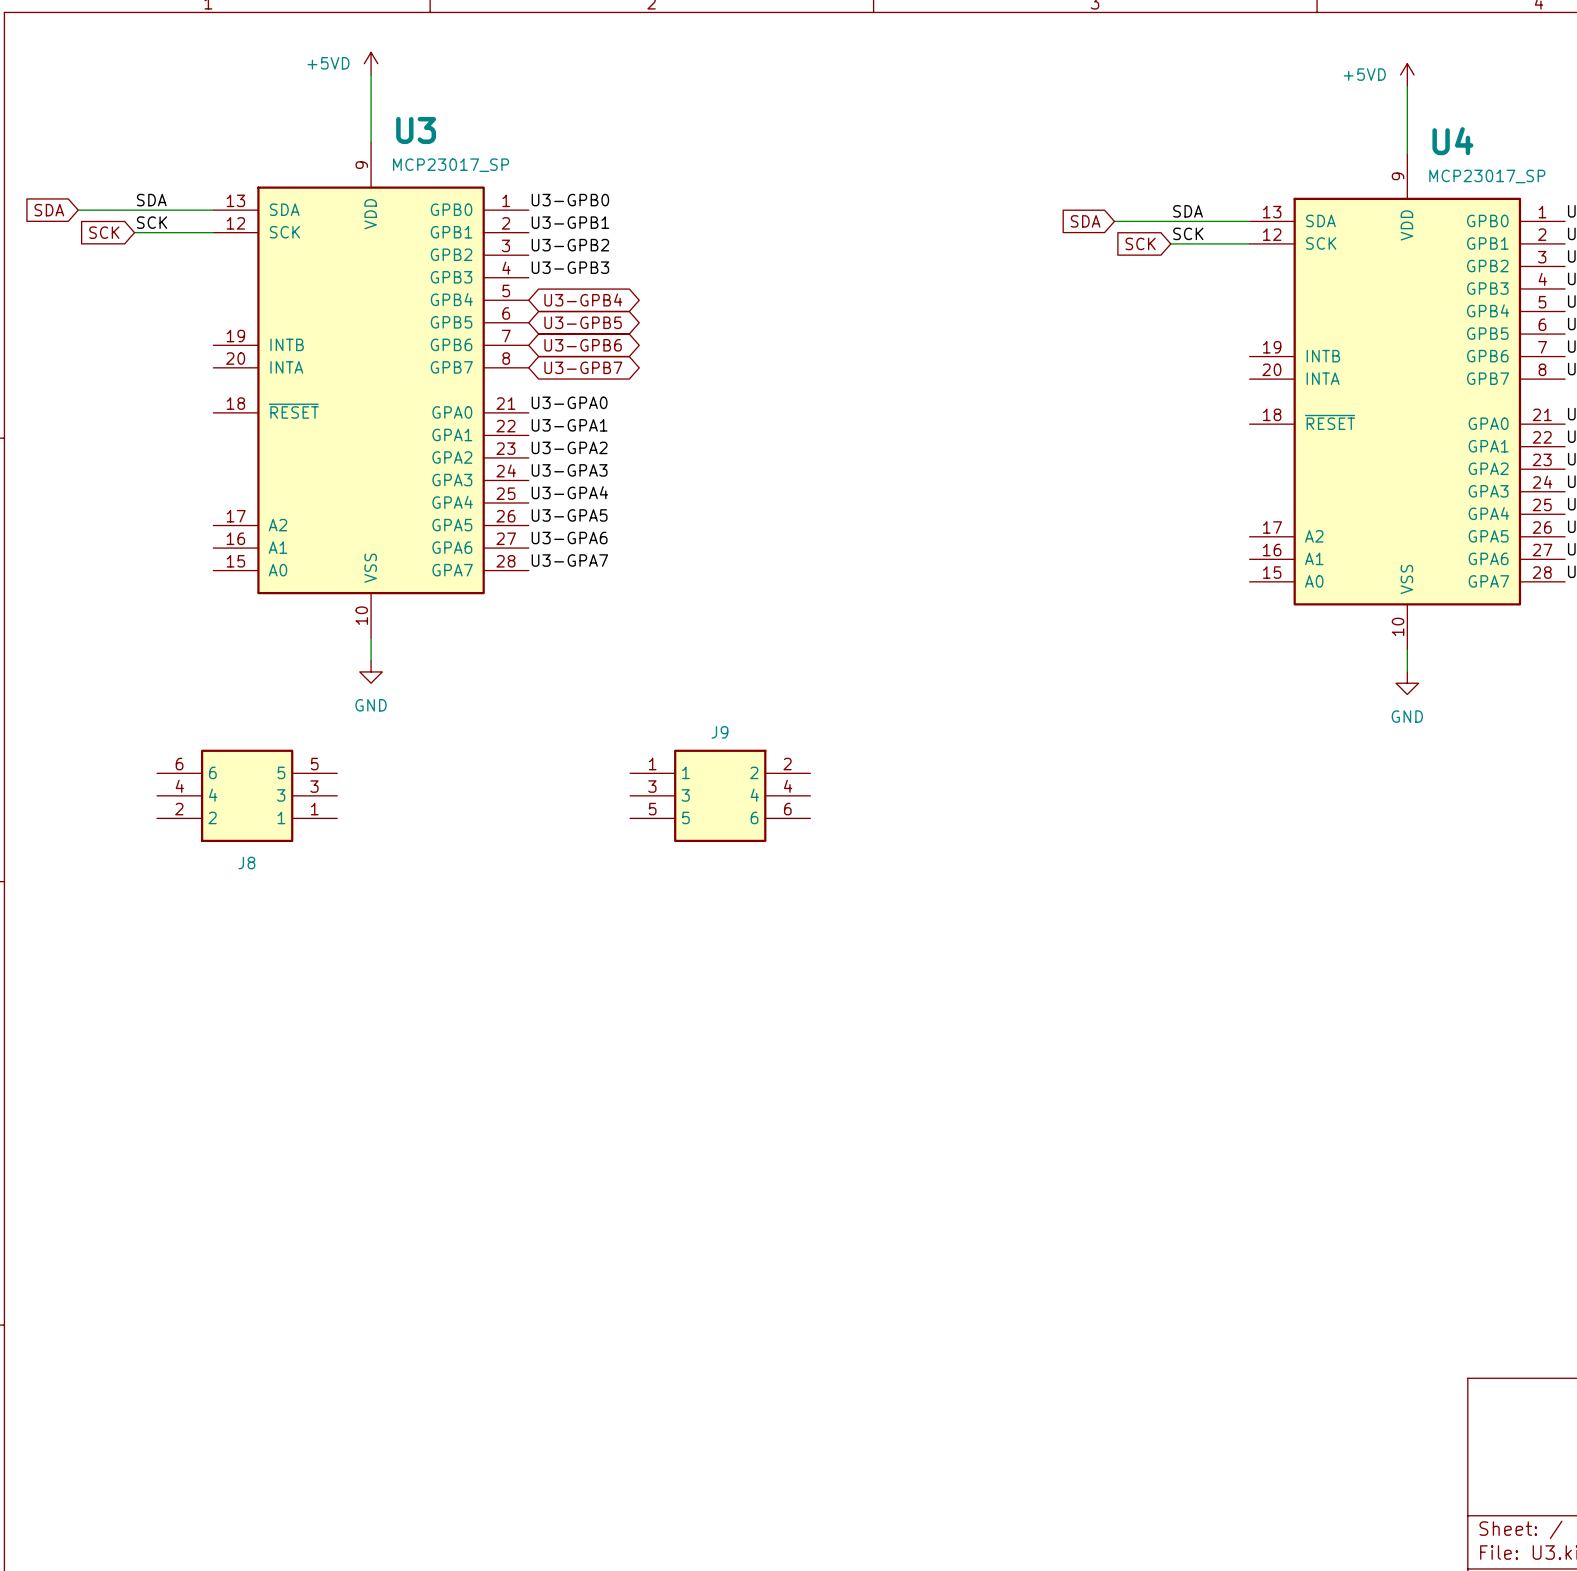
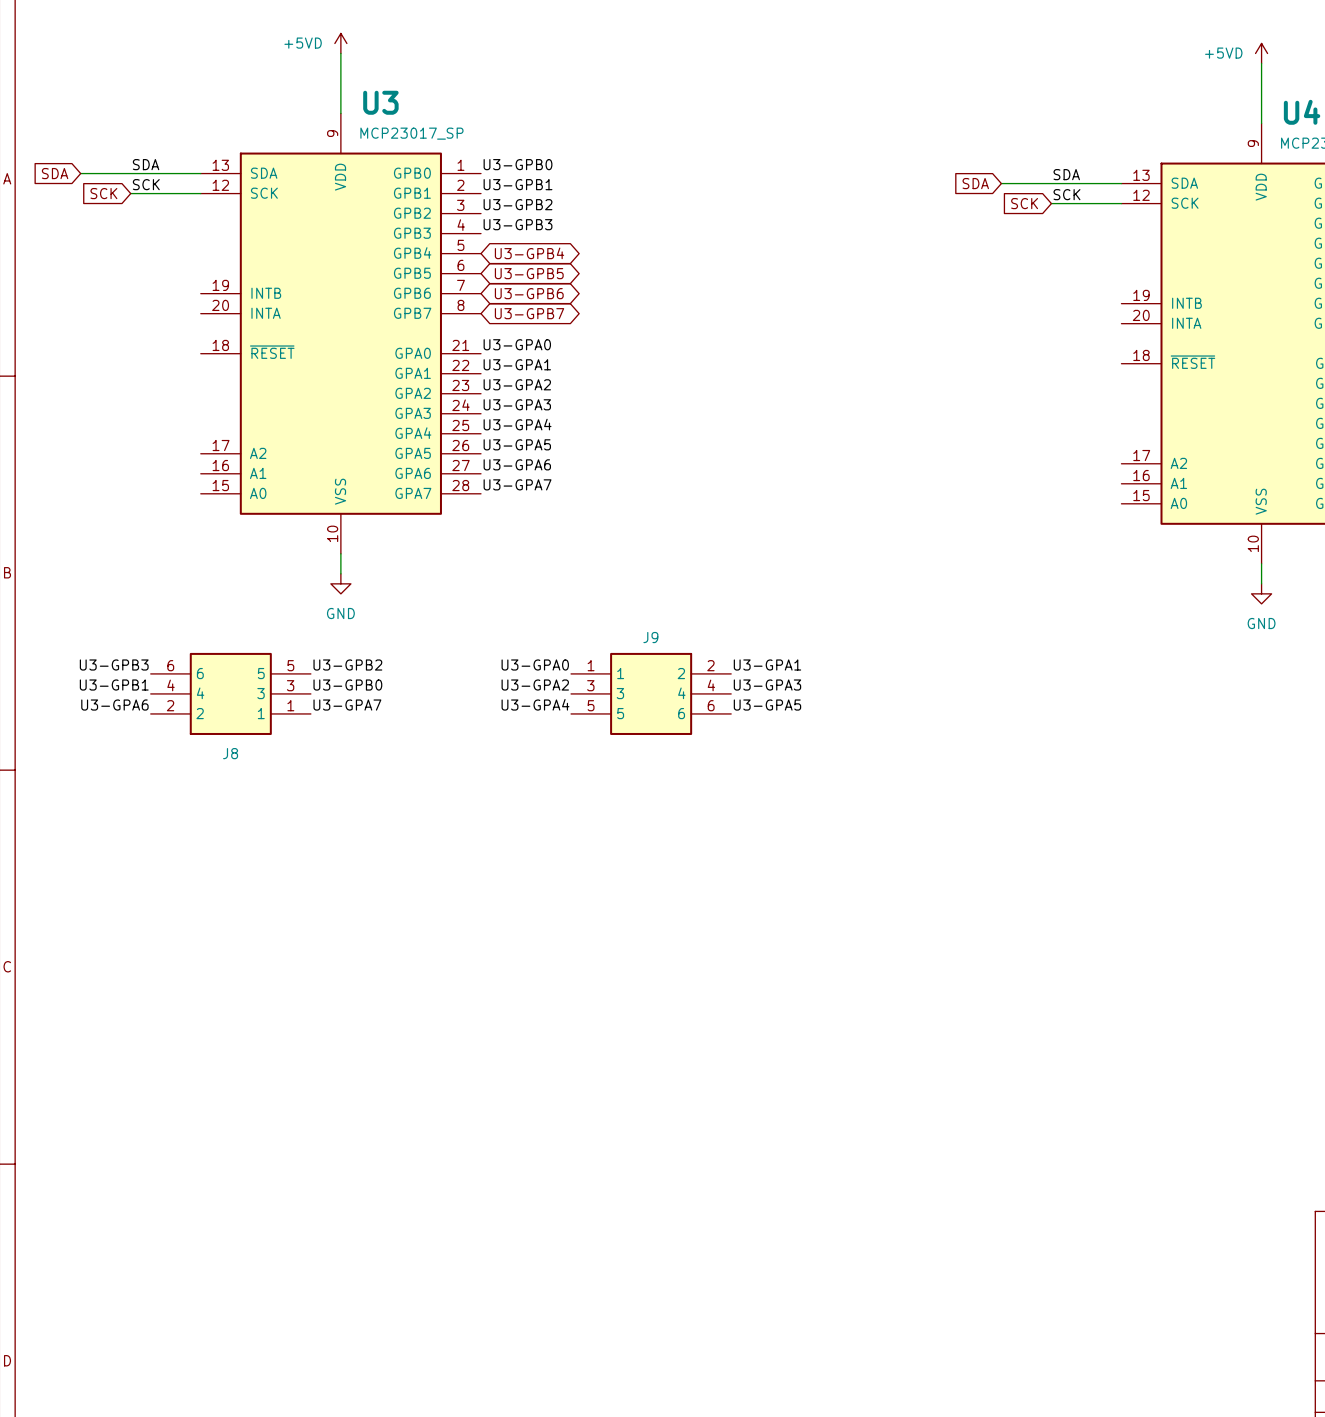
label: none -> U3-GPB3 (114, 665)
label: none -> U3-GPB2 (347, 665)
label: none -> U3-GPA0 (535, 665)
label: none -> U3-GPA1 (767, 665)
label: none -> U3-GPB1 (114, 685)
label: none -> U3-GPB0 (347, 685)
label: none -> U3-GPA2 (535, 685)
label: none -> U3-GPA3 (767, 685)
label: none -> U3-GPA6 (114, 705)
label: none -> U3-GPA7 (347, 705)
label: none -> U3-GPA4 (535, 704)
label: none -> U3-GPA5 (767, 705)

